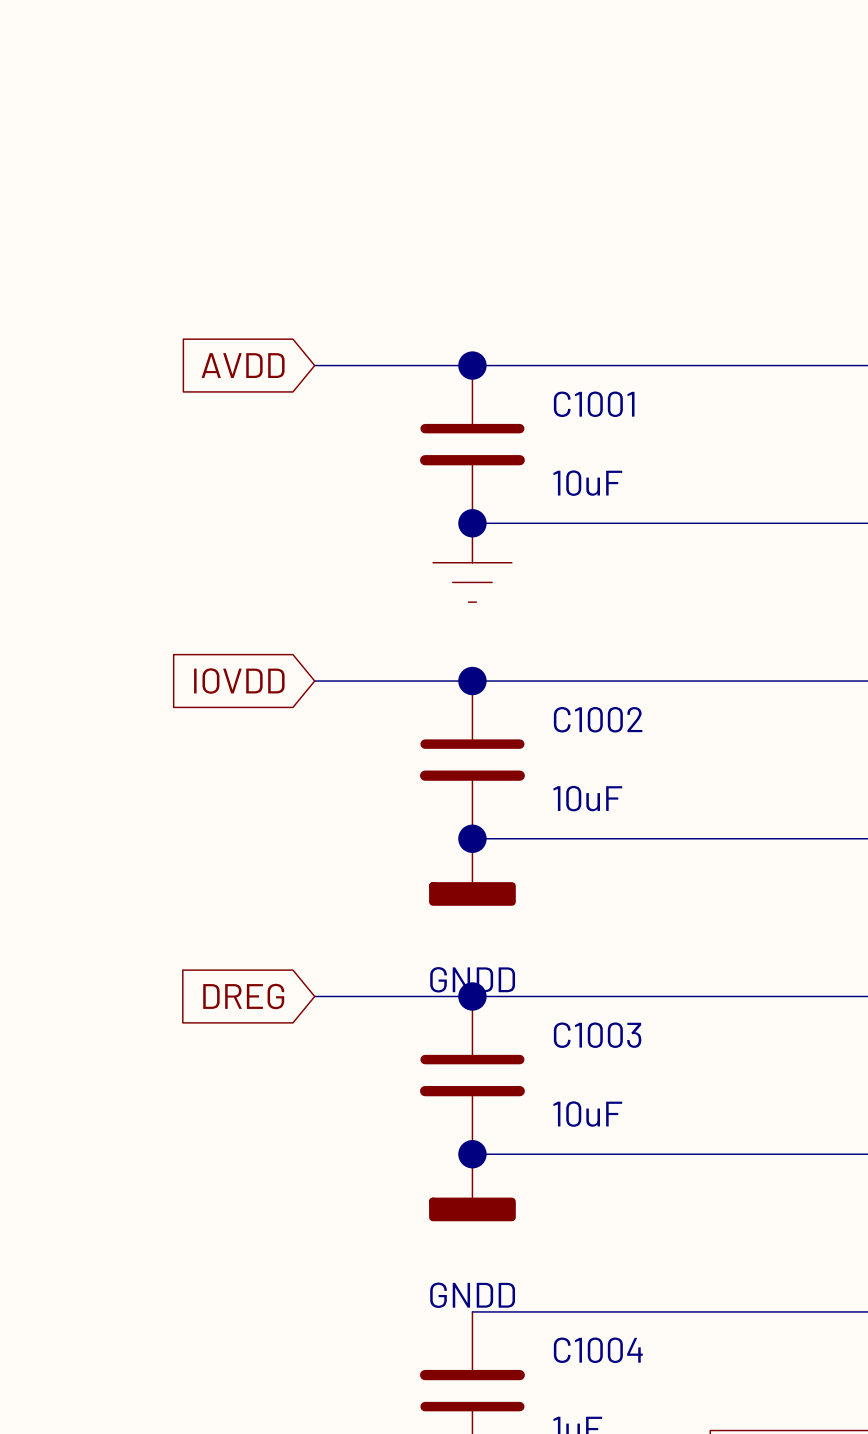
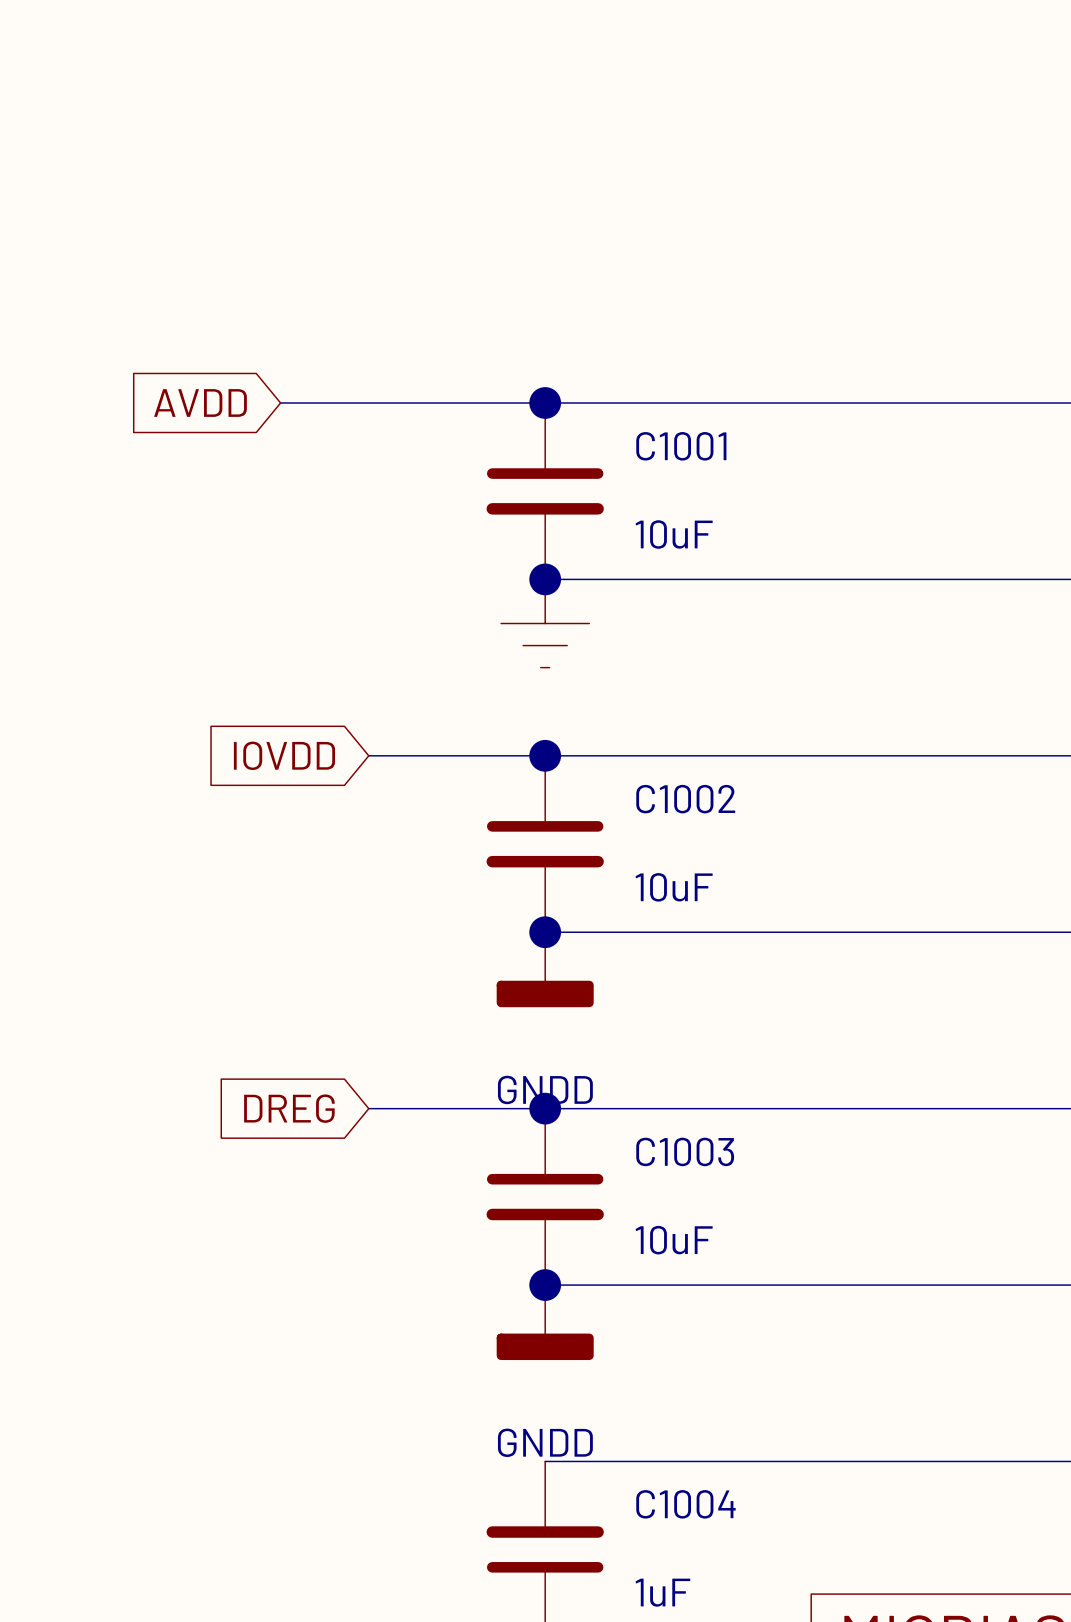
wire: none -> (280, 402) (368, 402)
global label position: AVDD (243, 365) -> AVDD (200, 402)

